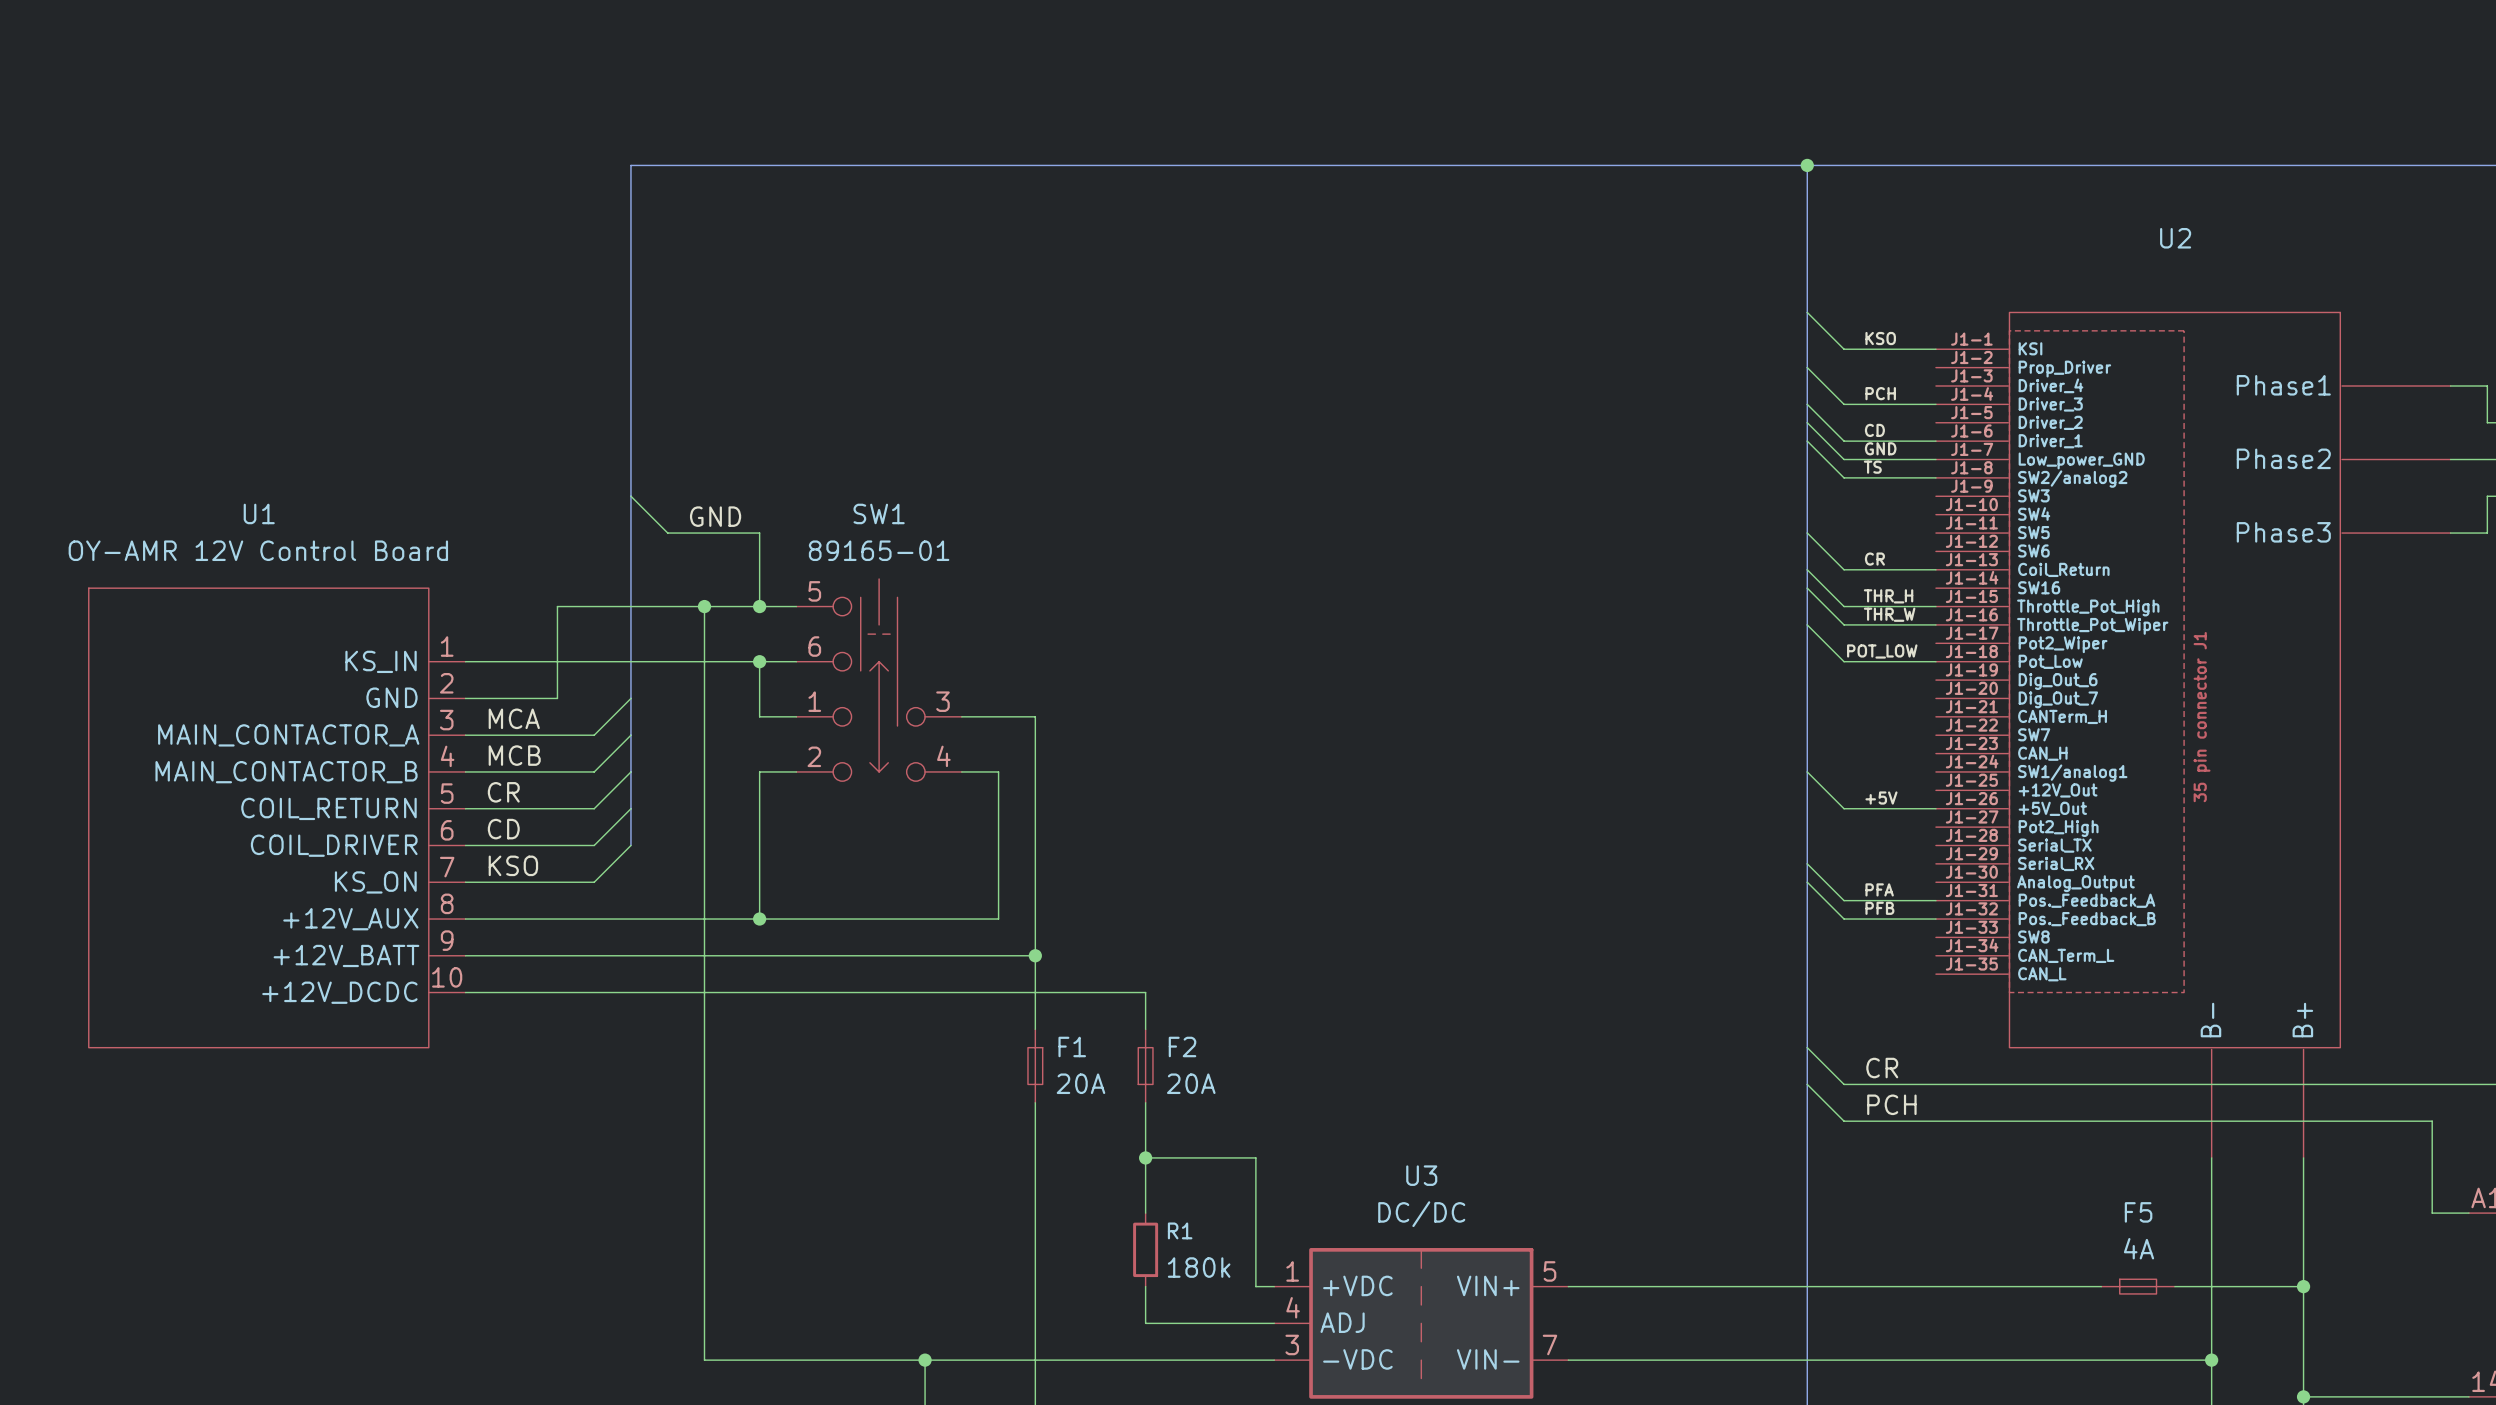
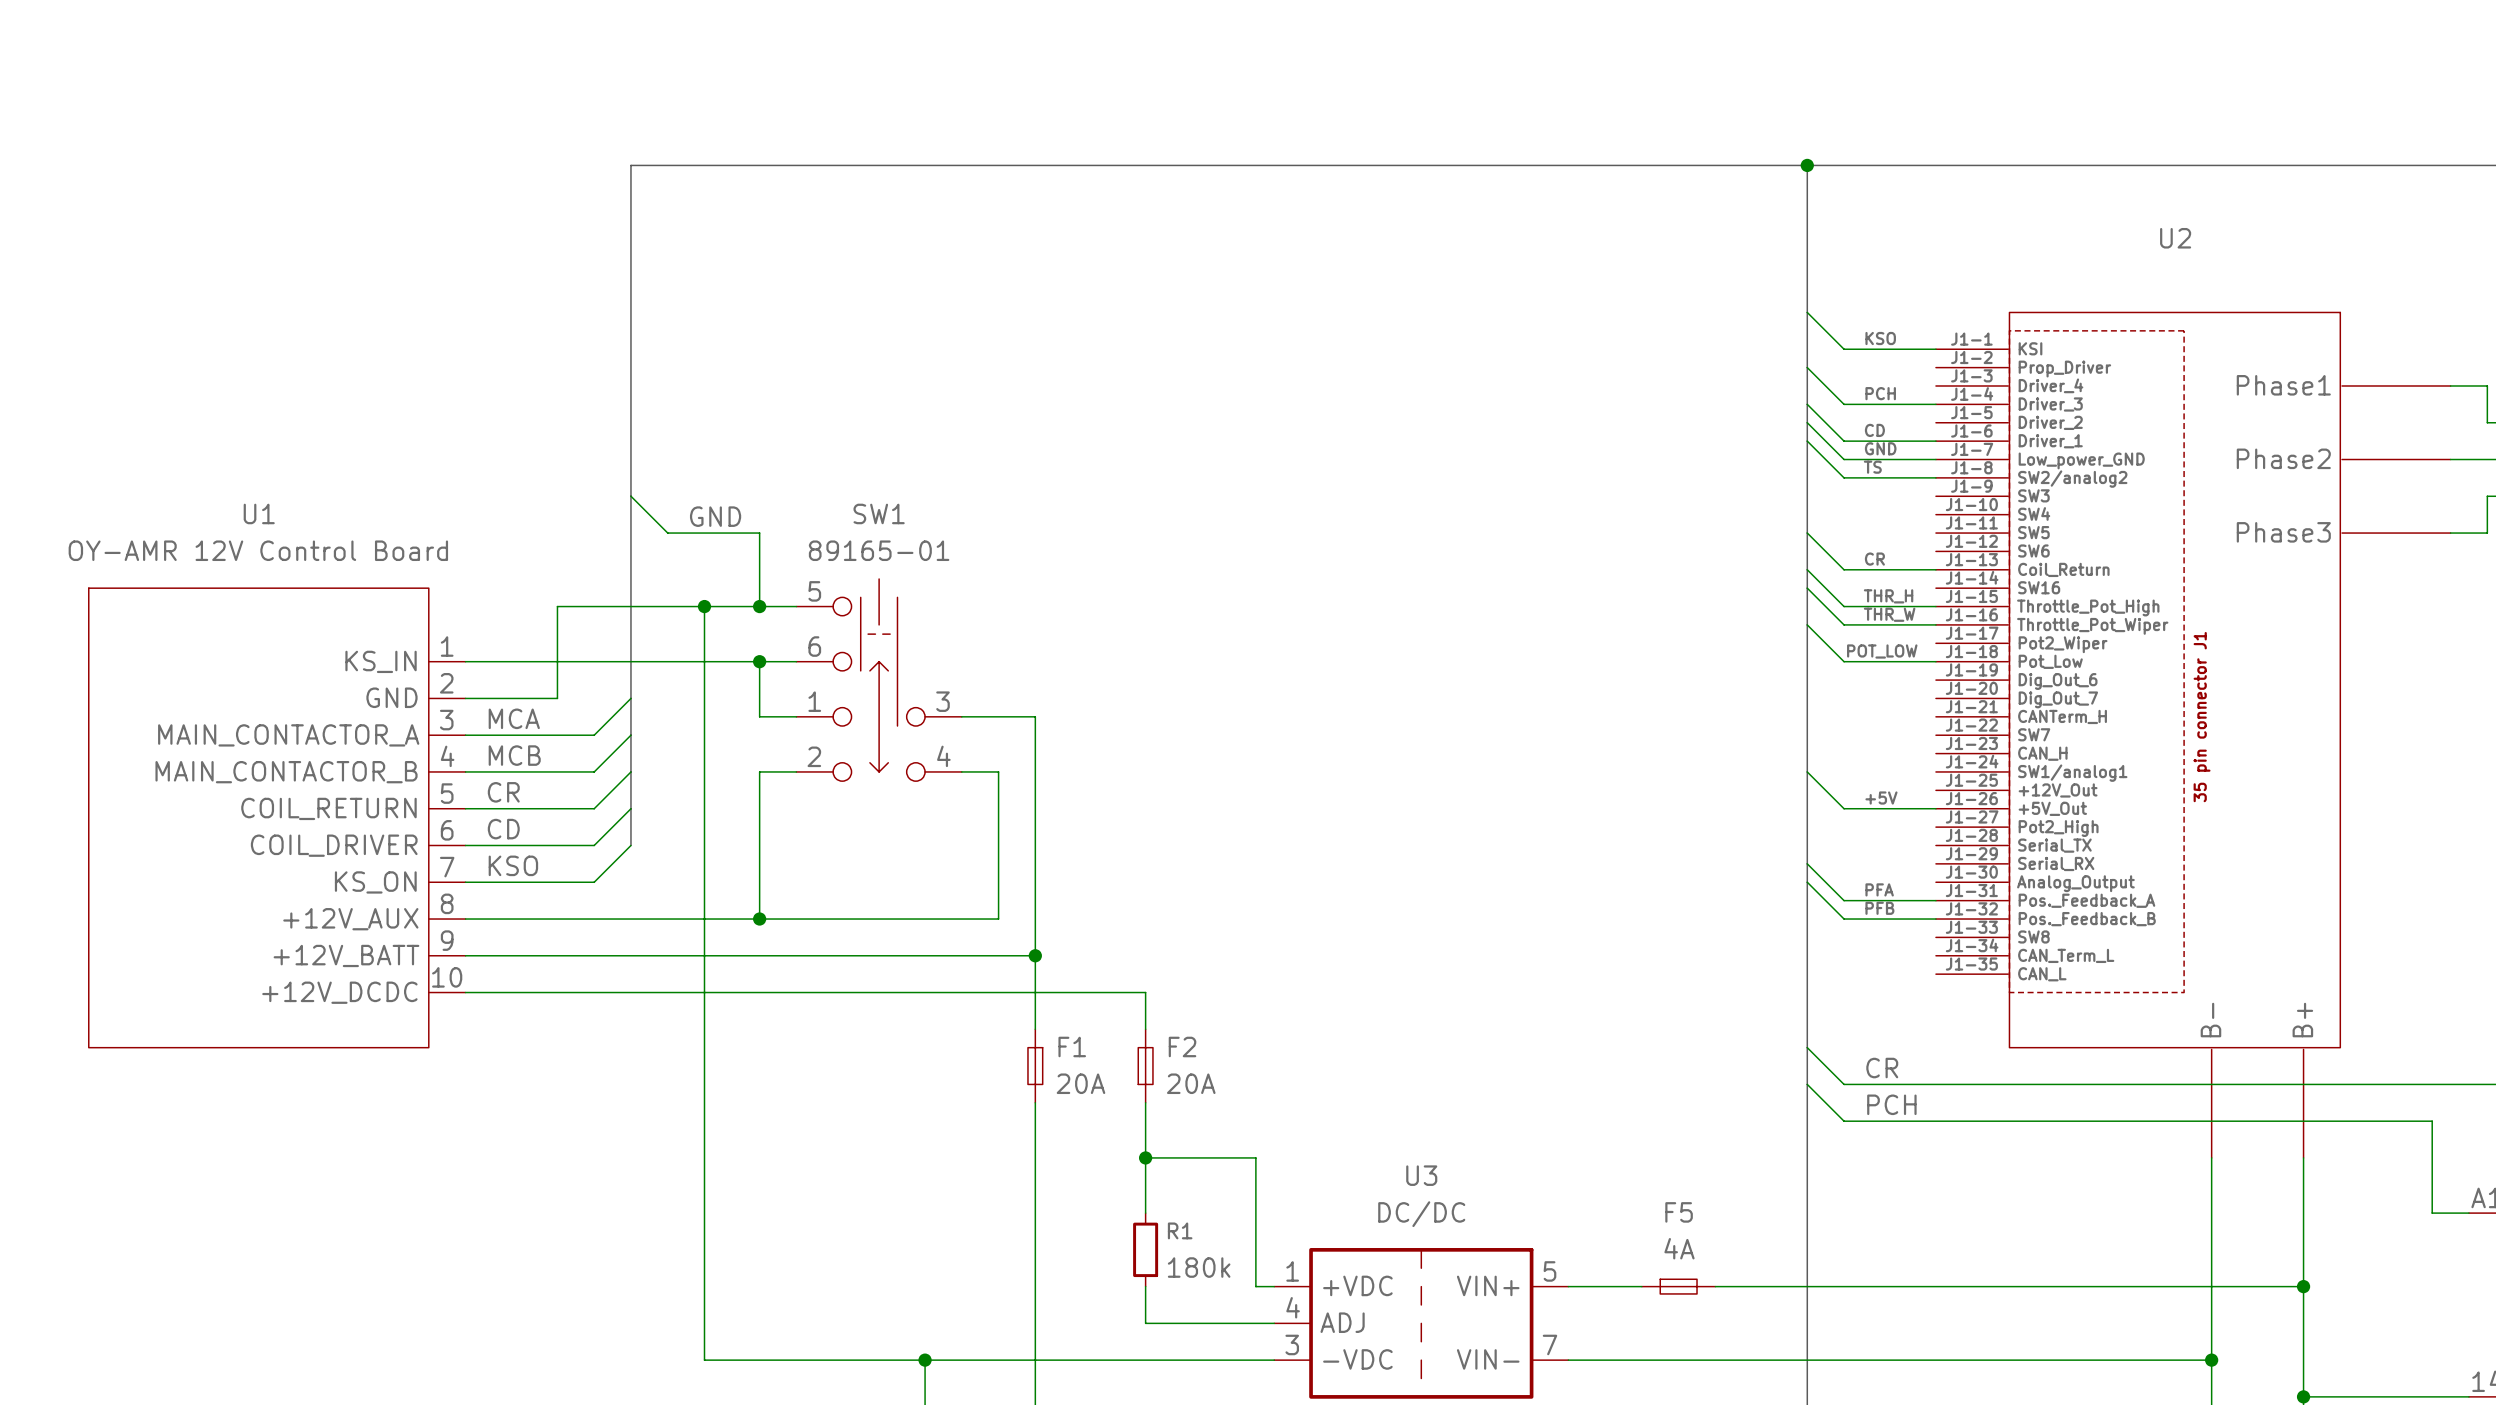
F5 position: (2138, 1286) -> (1678, 1286)

